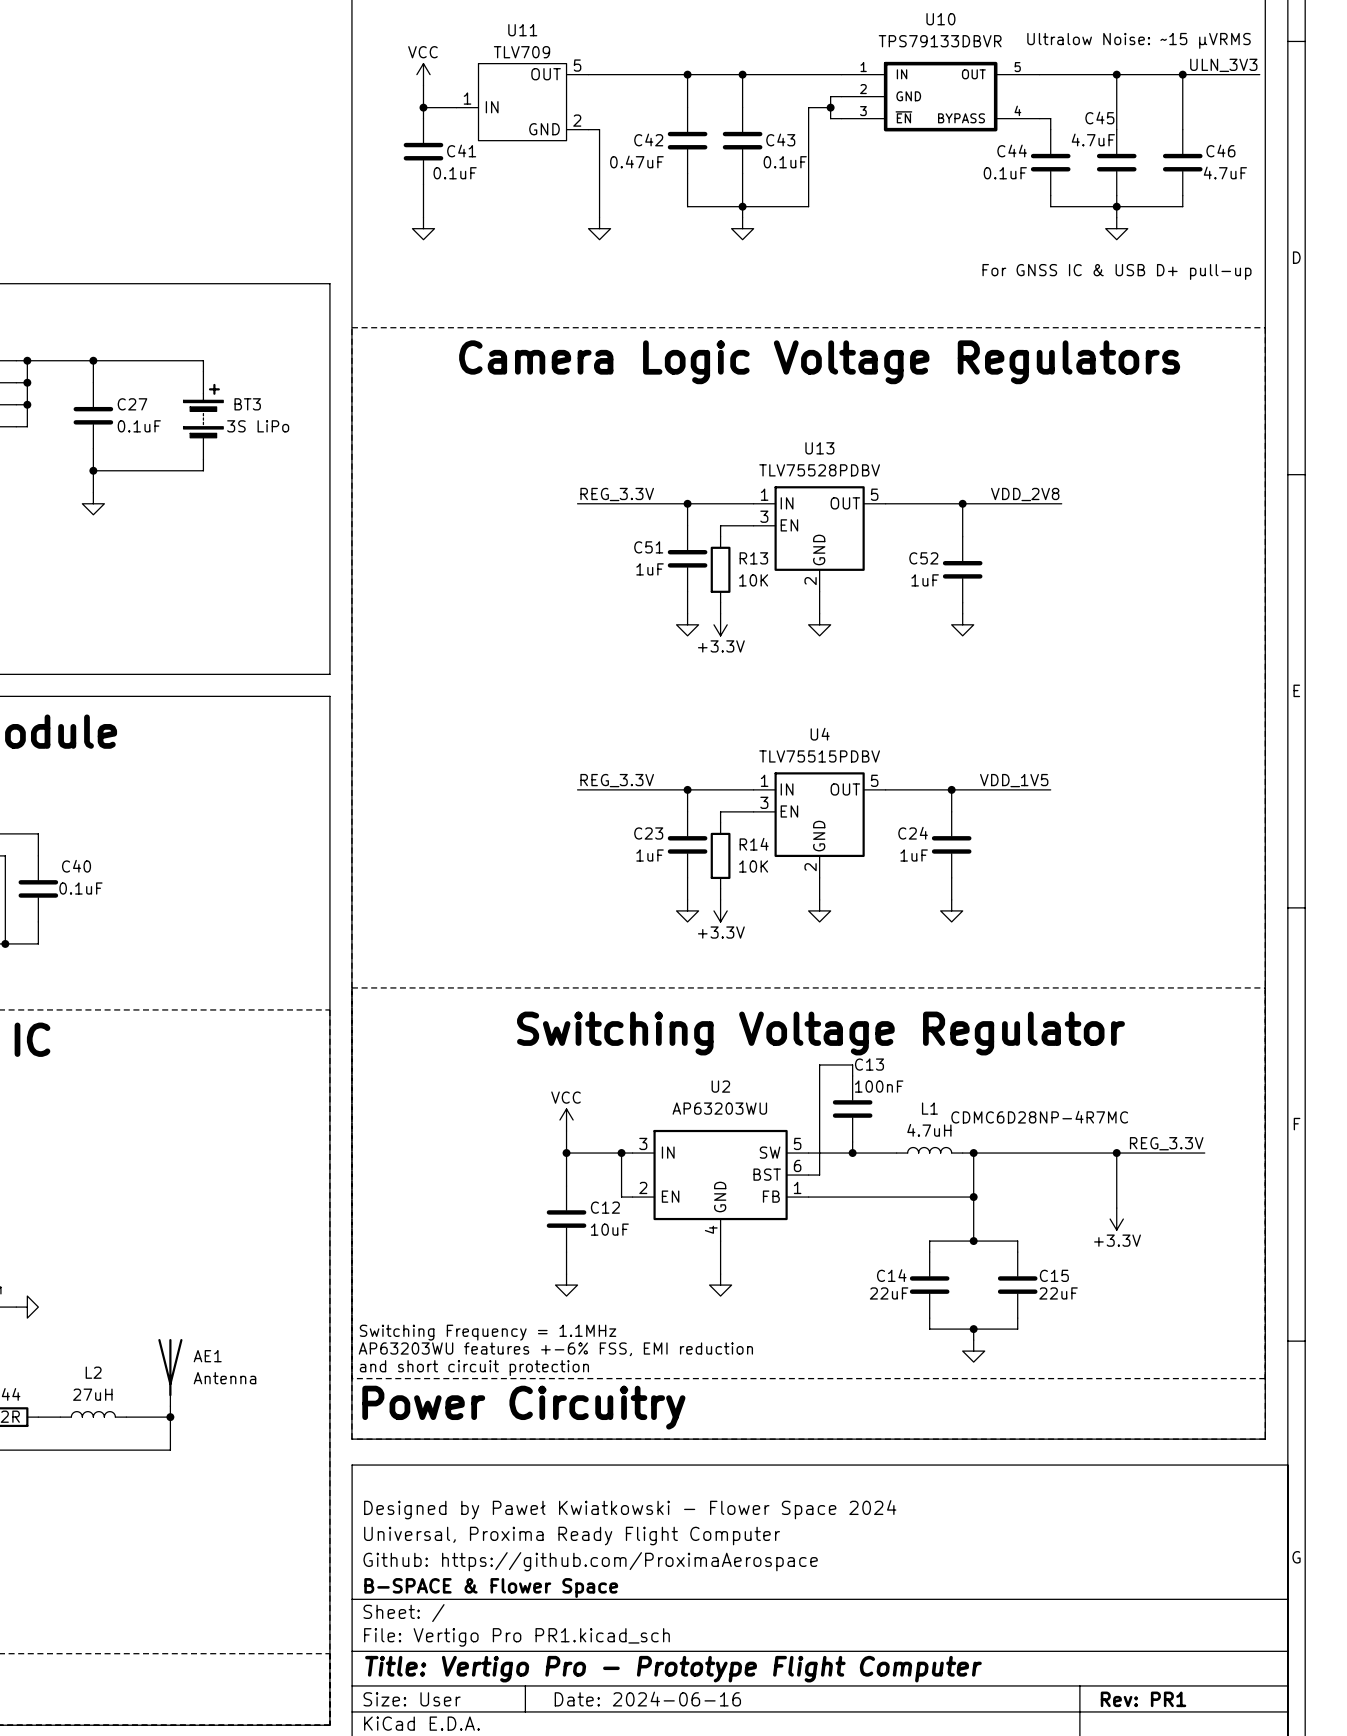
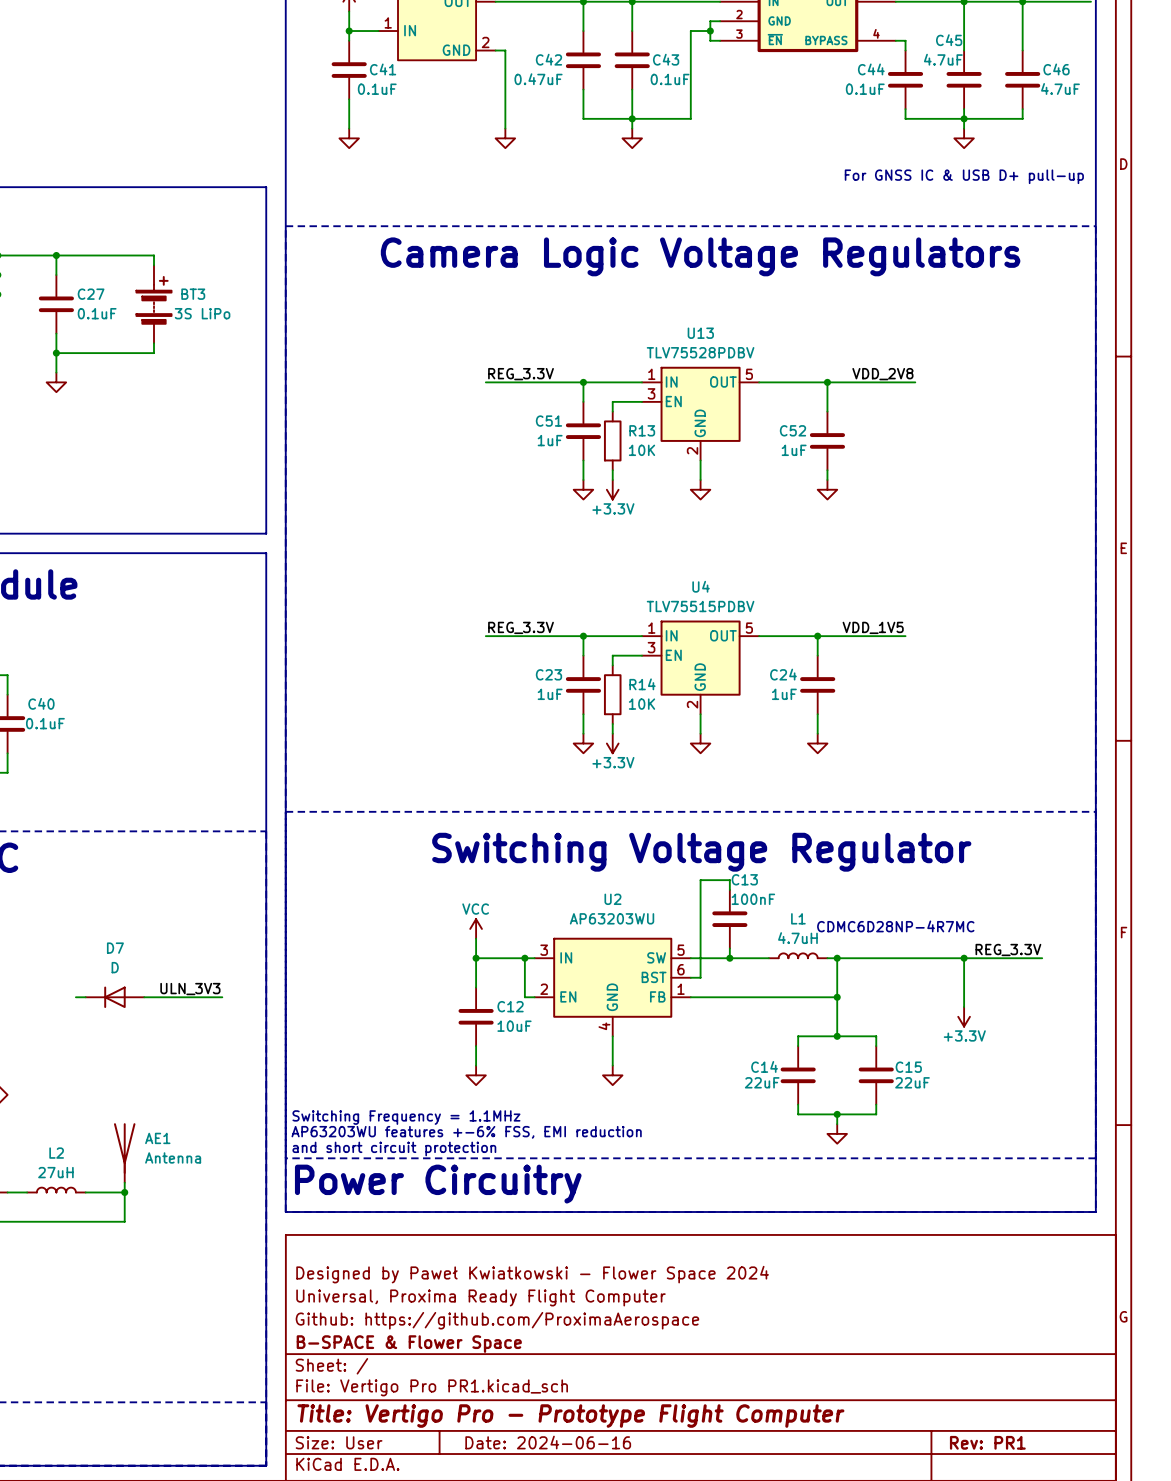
label: none -> ULN_3V3 (190, 989)
wire: none -> (75, 997) (85, 997)
D7: none -> D (114, 997)
wire: none -> (144, 997) (222, 997)

